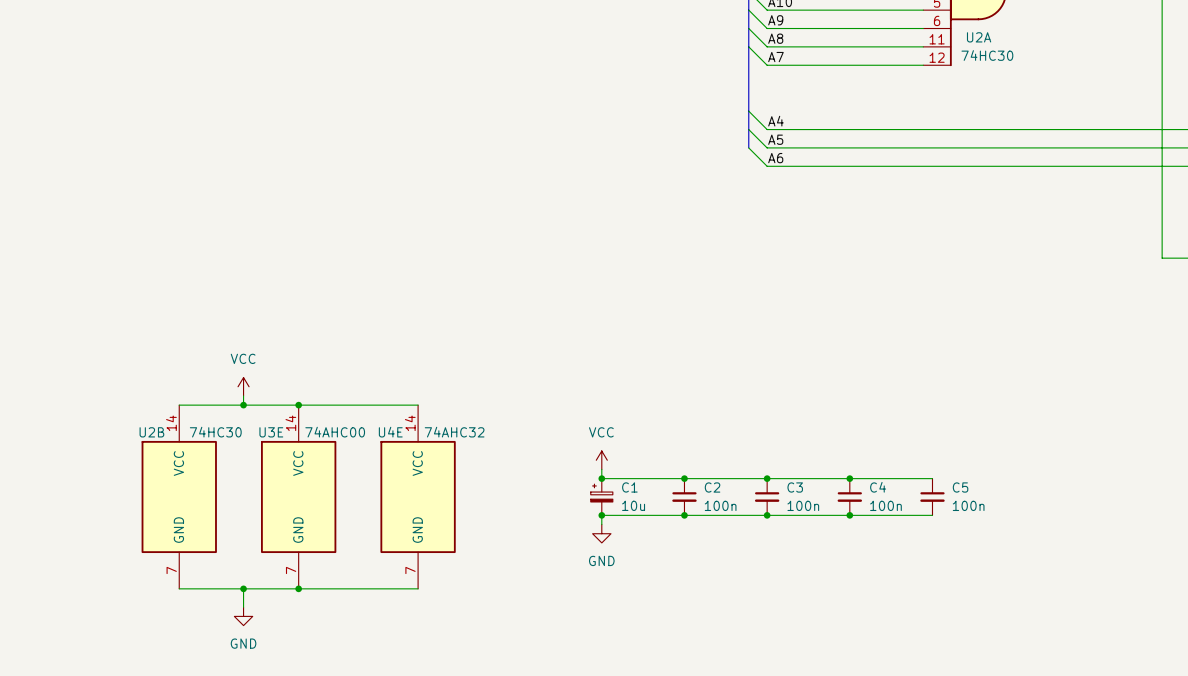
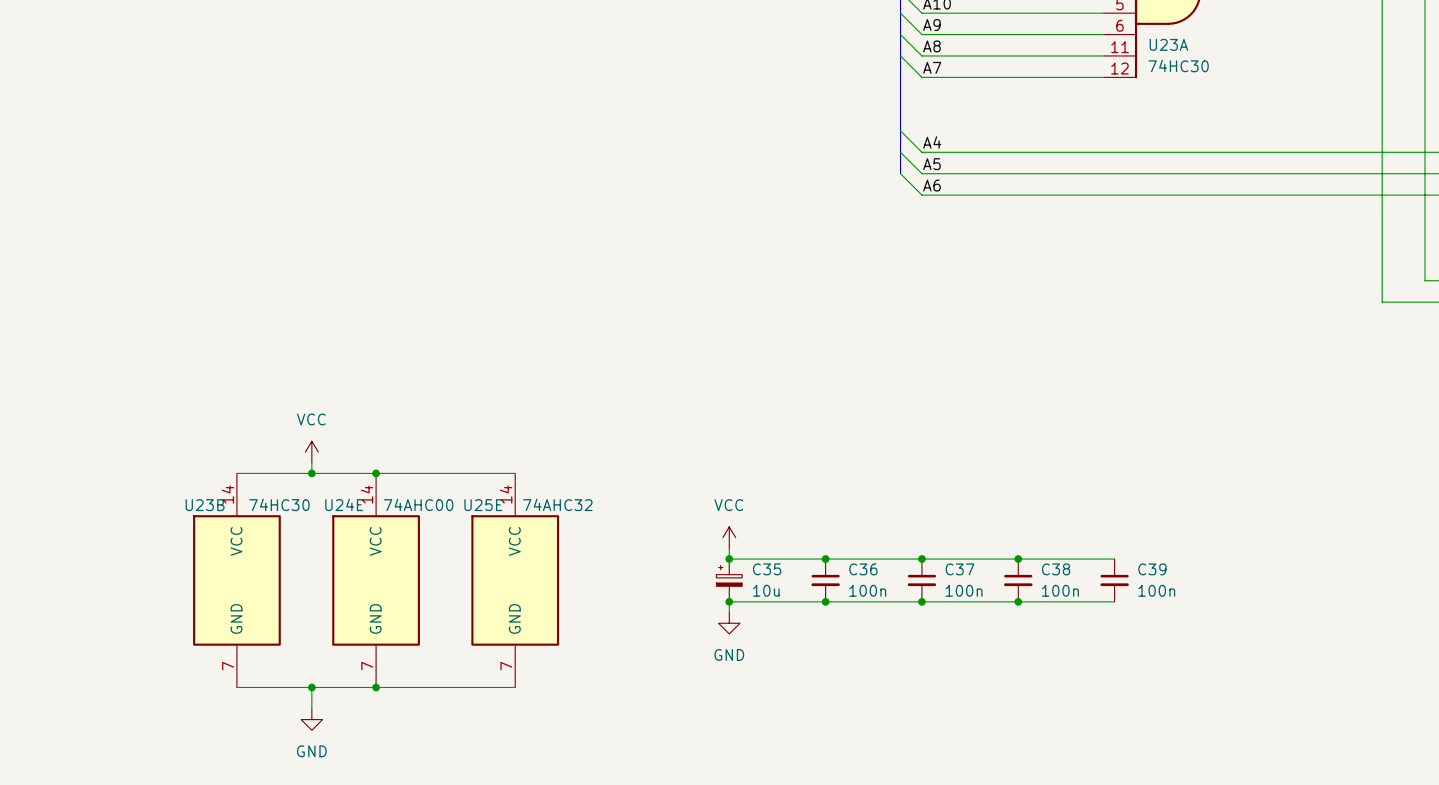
U2A name: U2A (979, 37) -> U23A (1168, 44)
U2B name: U2B (151, 432) -> U23B (205, 505)
U3E name: U3E (271, 432) -> U24E (344, 504)
U4E name: U4E (390, 432) -> U25E (483, 505)
C1 name: C1 (629, 487) -> C35 (767, 569)
C2 name: C2 (712, 487) -> C36 (863, 569)
C3 name: C3 (795, 487) -> C37 (960, 569)
C4 name: C4 (878, 487) -> C38 (1056, 569)
C5 name: C5 (960, 487) -> C39 (1152, 569)

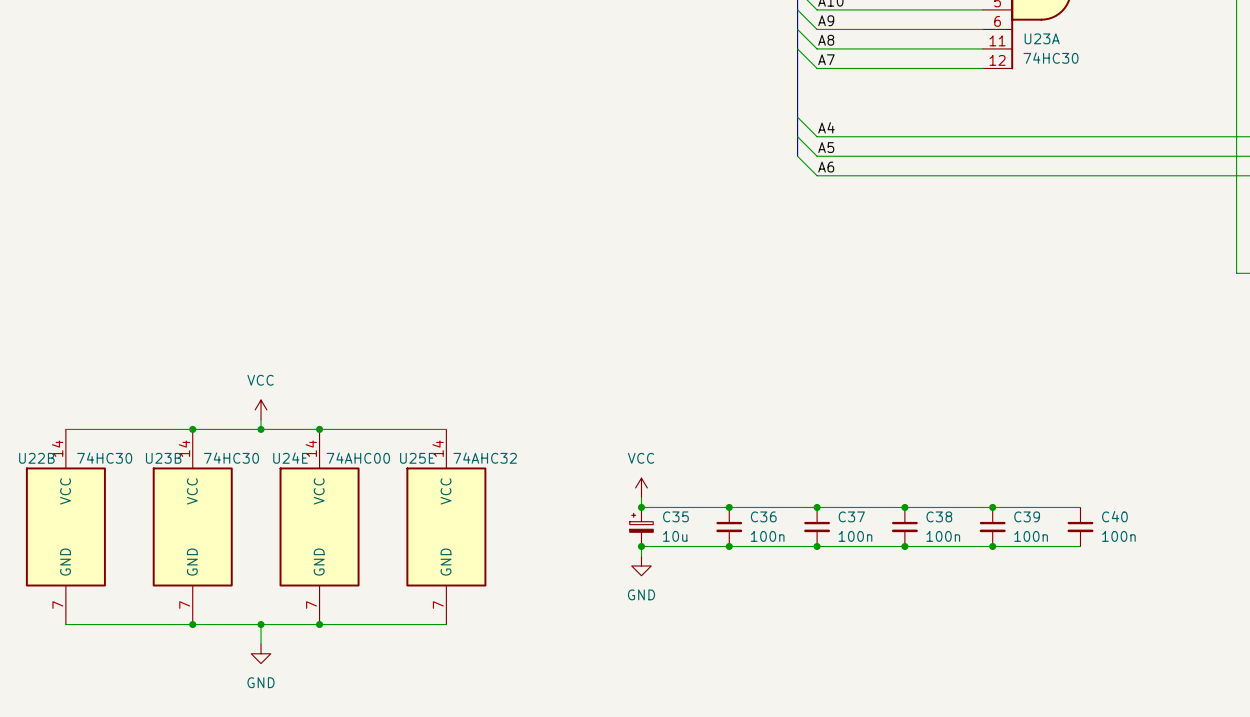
wire: none -> (65, 429) (192, 429)
junction: none -> (192, 429)
wire: none -> (992, 507) (1080, 507)
junction: none -> (992, 507)
U22B: none -> 74HC30 (65, 526)
C40: none -> 100n (1080, 526)
wire: none -> (992, 546) (1080, 546)
junction: none -> (992, 546)
wire: none -> (65, 624) (192, 624)
junction: none -> (192, 624)

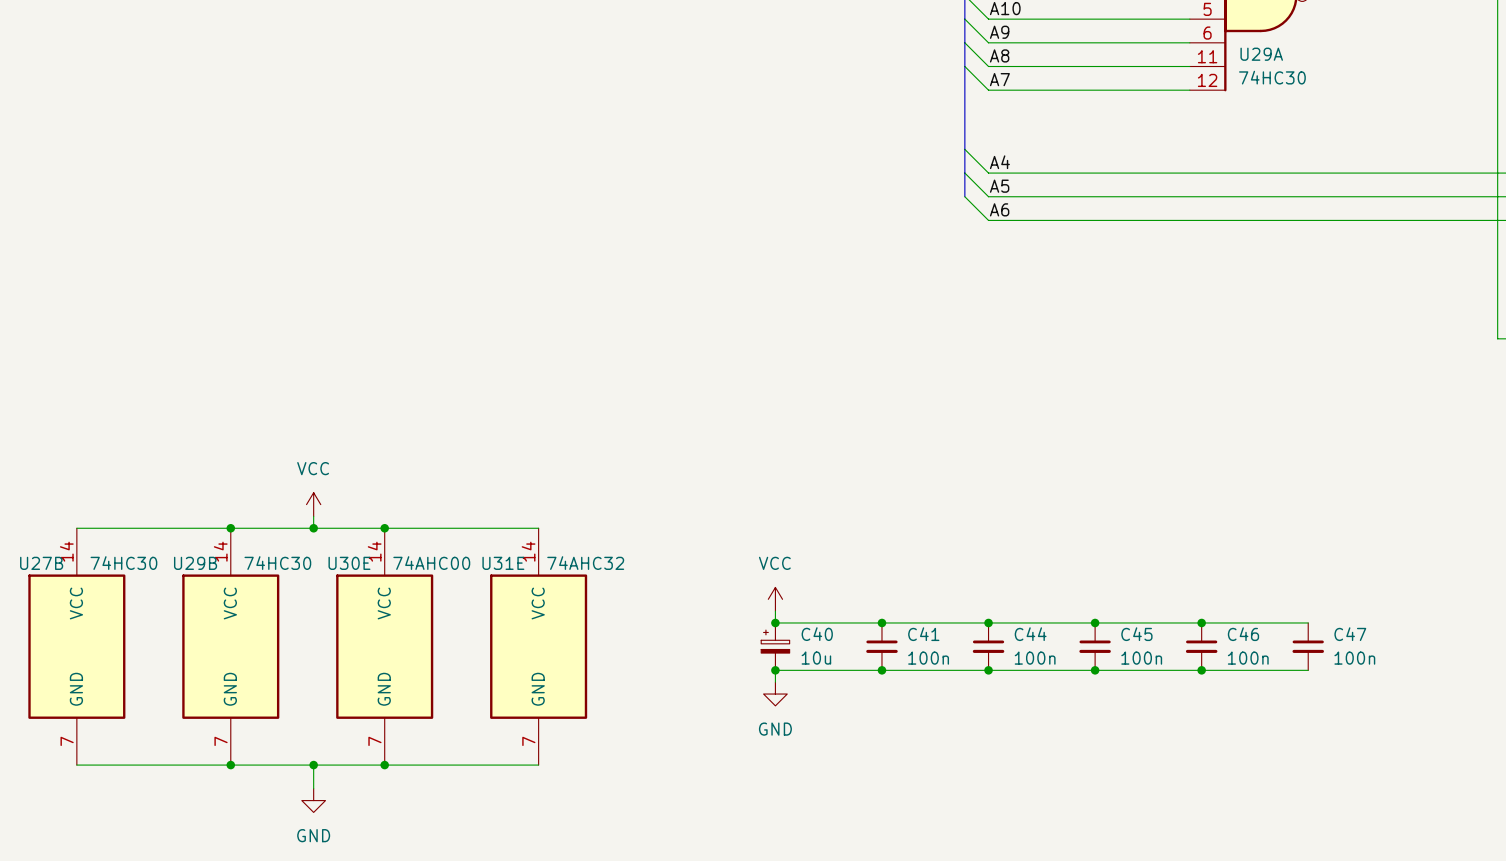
U23A name: U23A (1042, 38) -> U29A (1261, 54)
U22B name: U22B (36, 458) -> U27B (41, 563)
U23B name: U23B (163, 458) -> U29B (195, 563)
U24E name: U24E (290, 458) -> U30E (349, 563)
U25E name: U25E (417, 458) -> U31E (503, 563)
C35 name: C35 (675, 516) -> C40 (817, 634)
C36 name: C36 (763, 516) -> C41 (923, 634)
C37 name: C37 (851, 516) -> C44 (1030, 634)
C38 name: C38 (939, 516) -> C45 (1136, 634)
C39 name: C39 (1027, 516) -> C46 (1243, 634)
C40 name: C40 (1114, 516) -> C47 (1350, 634)

